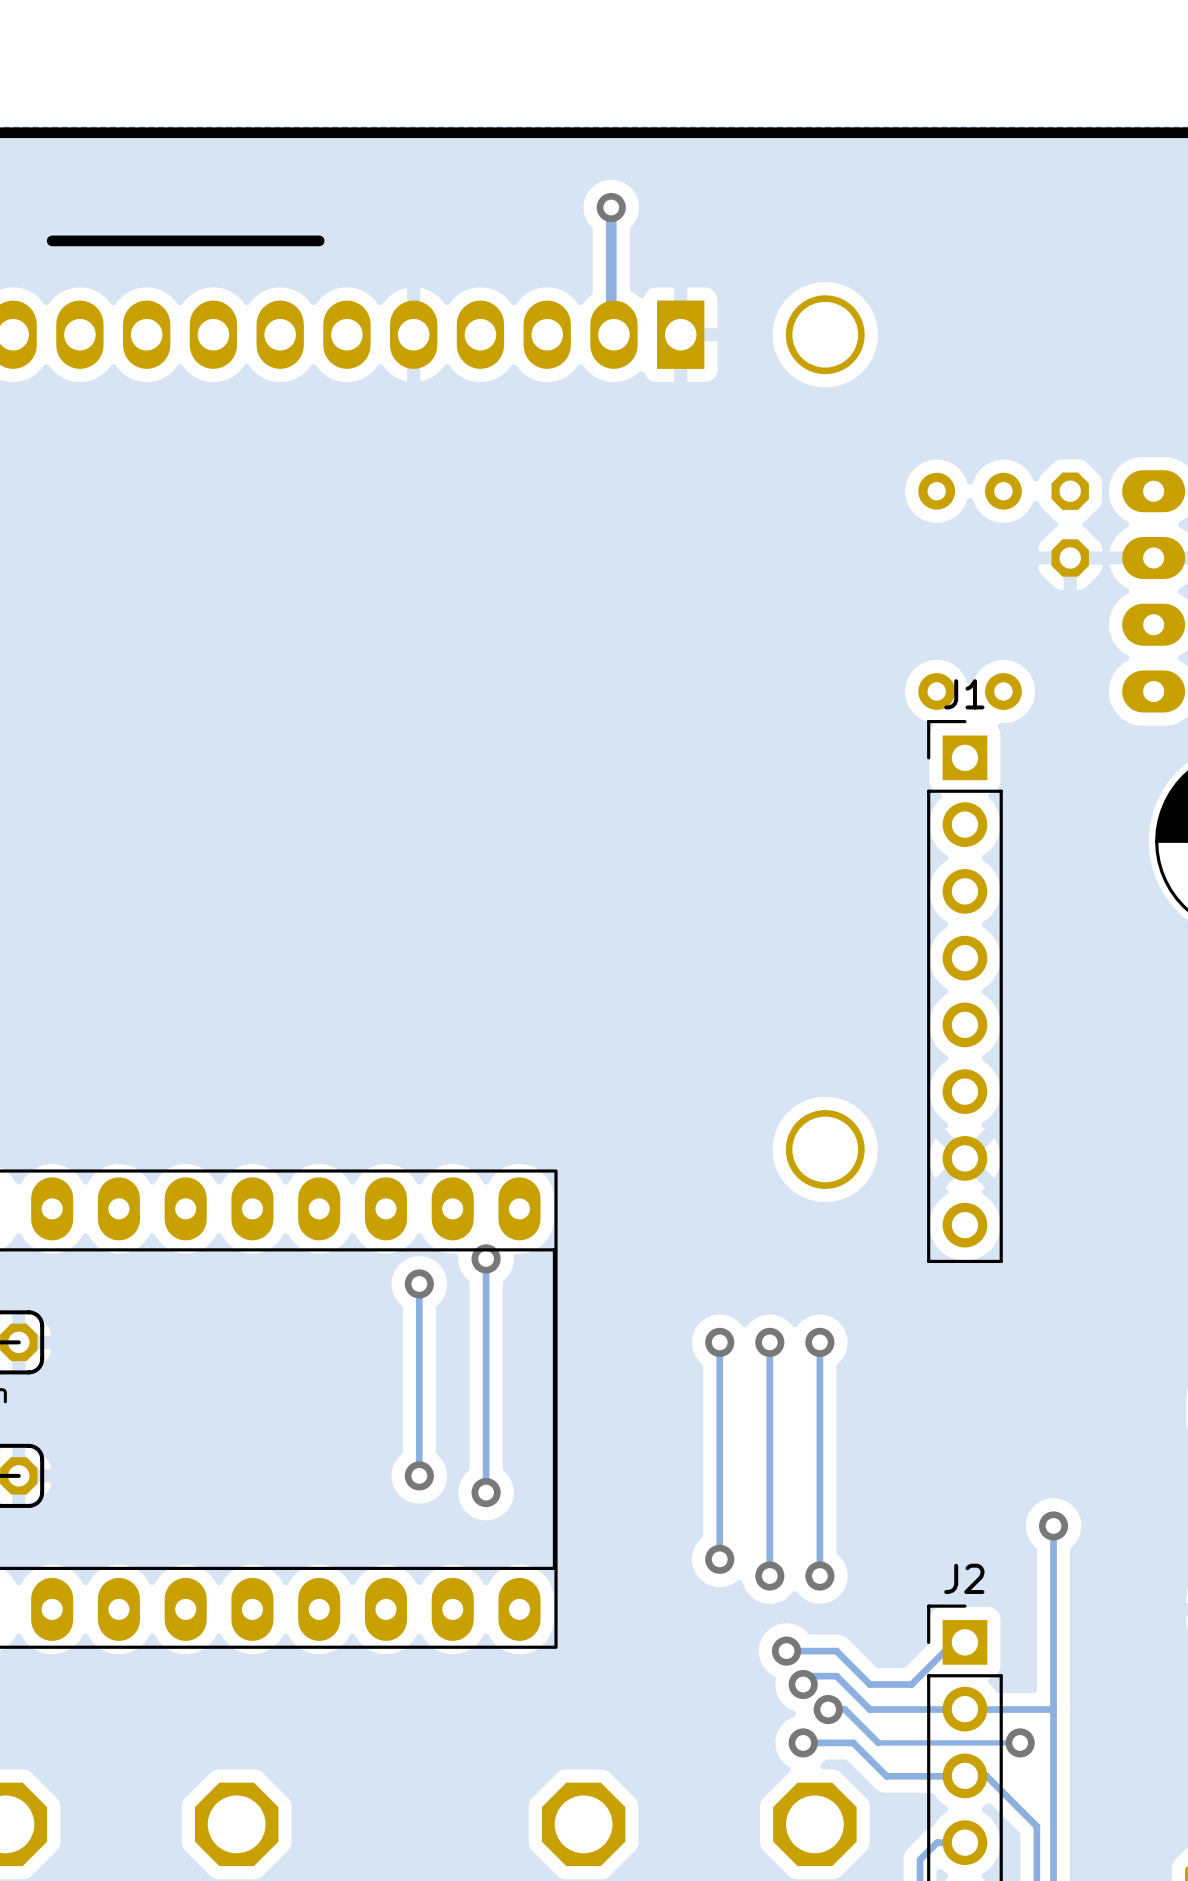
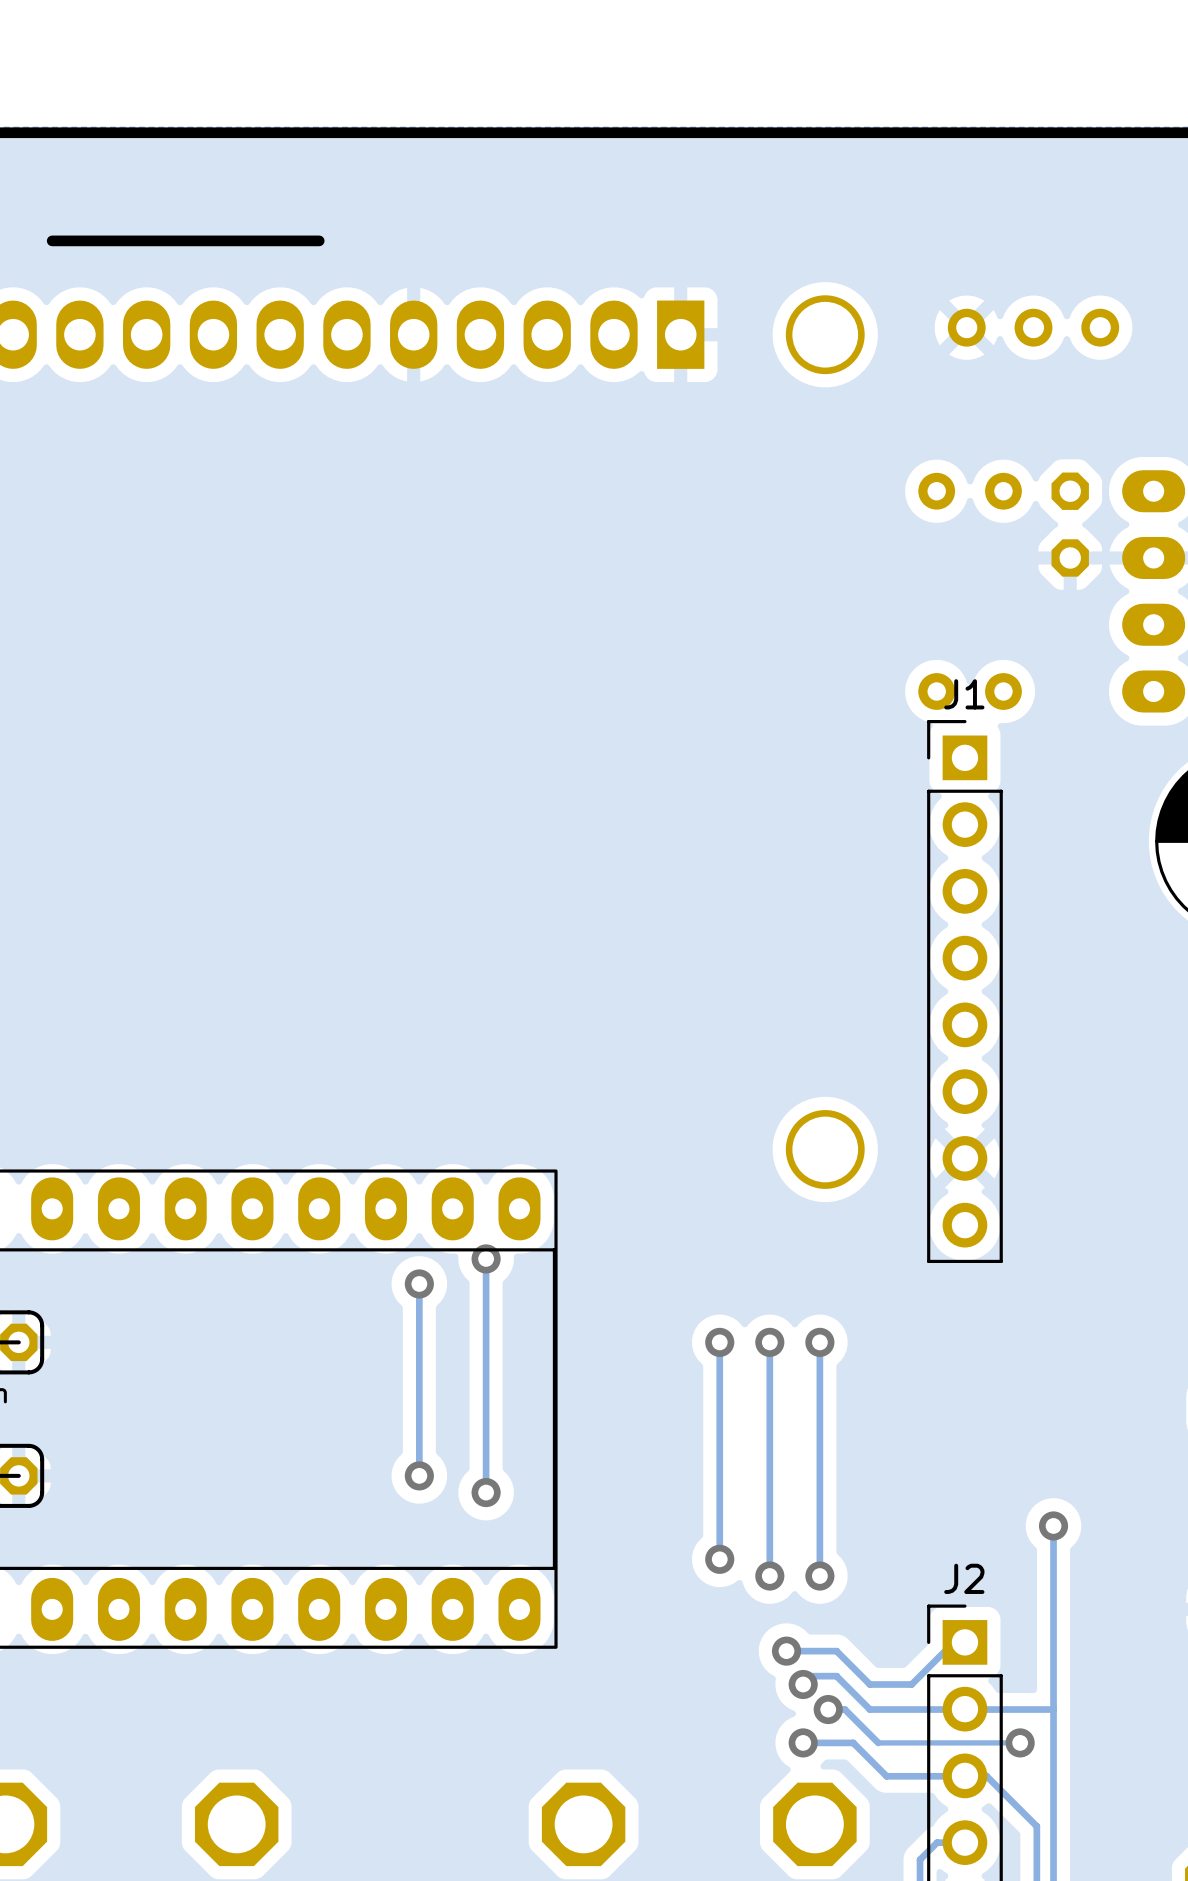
track: (611, 207) (611, 332) -> none
via: (611, 207) -> none
part: none -> (1033, 327)

